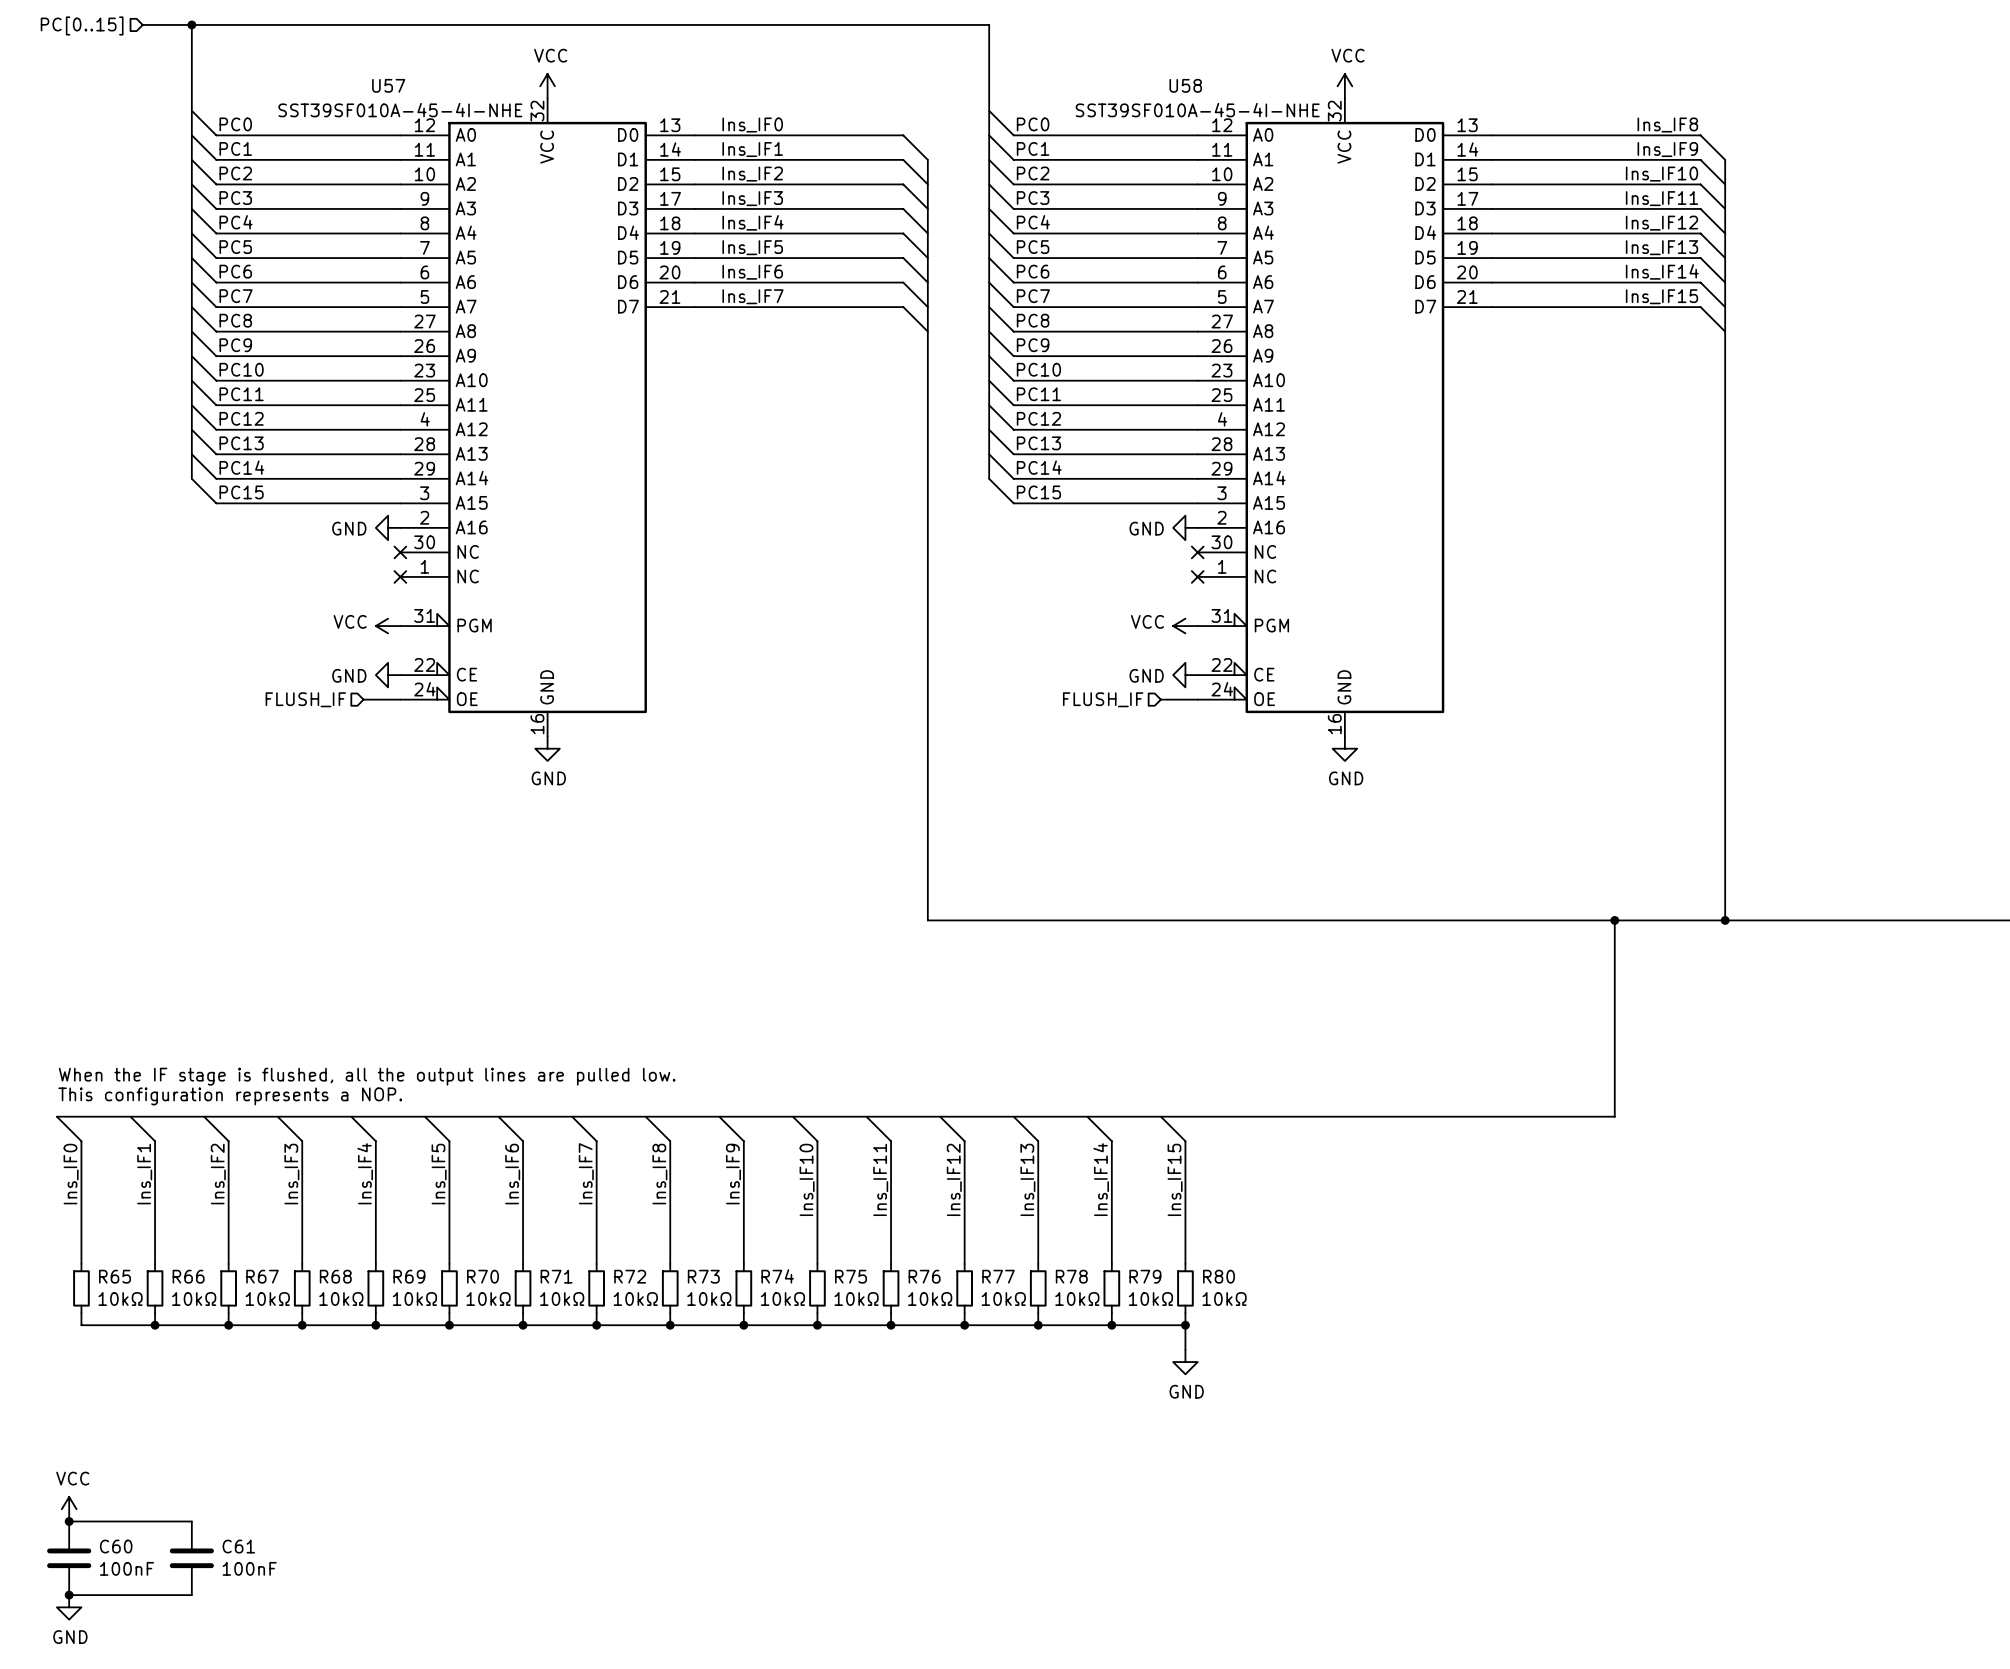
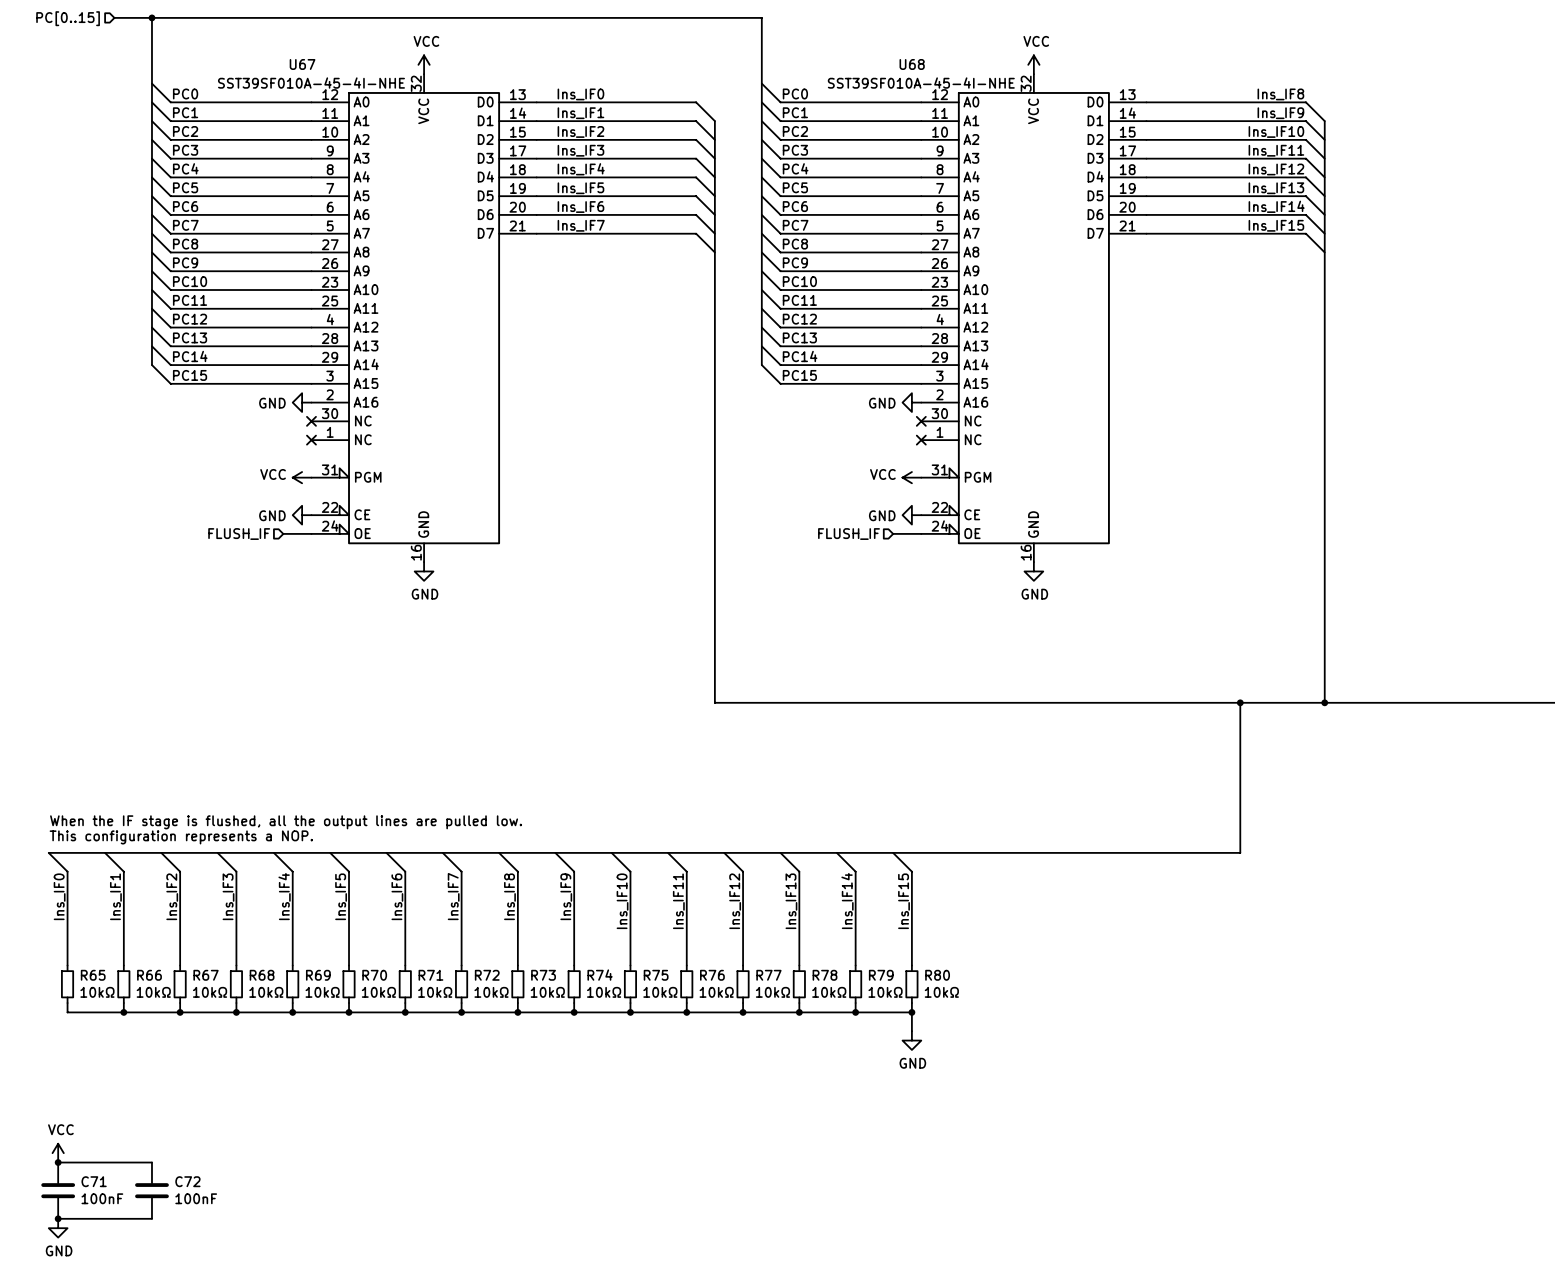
U57 name: U57 (388, 85) -> U67 (302, 64)
U58 name: U58 (1185, 85) -> U68 (912, 64)
C60 name: C60 (116, 1546) -> C71 (94, 1181)
C61 name: C61 (238, 1546) -> C72 (187, 1181)

